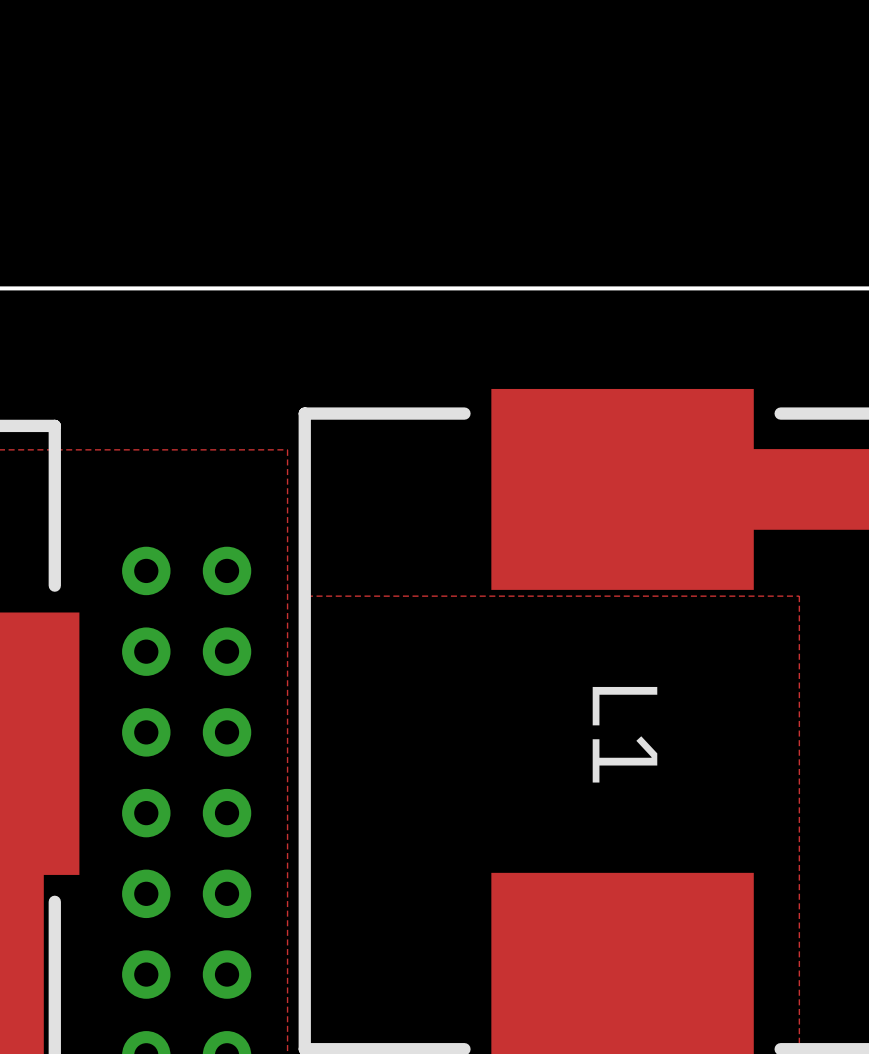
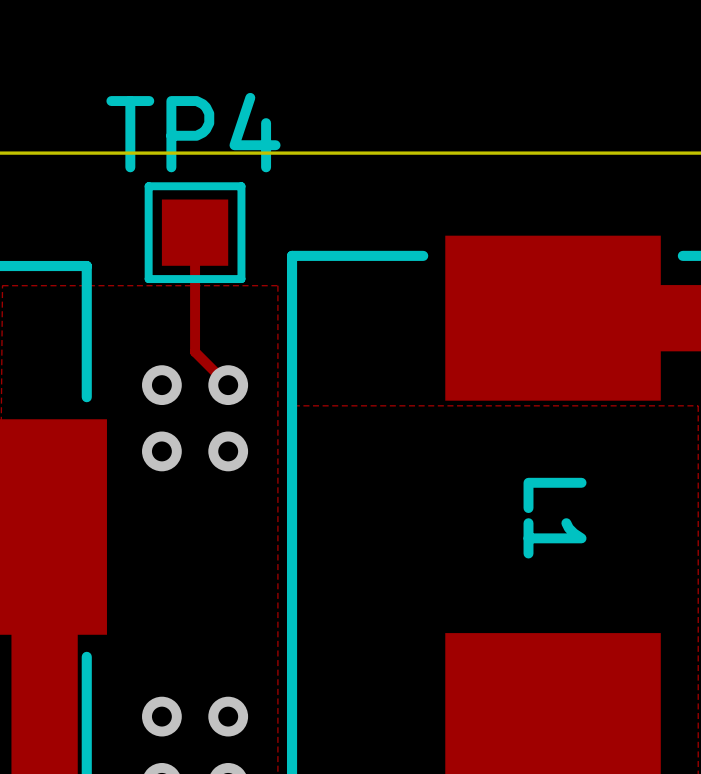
top track: none -> (195, 232) (195, 351) (228, 385)
TP4: none -> (195, 232)
via: (146, 732) -> none
via: (227, 732) -> none
via: (146, 813) -> none
via: (227, 813) -> none
via: (146, 893) -> none
via: (227, 893) -> none

